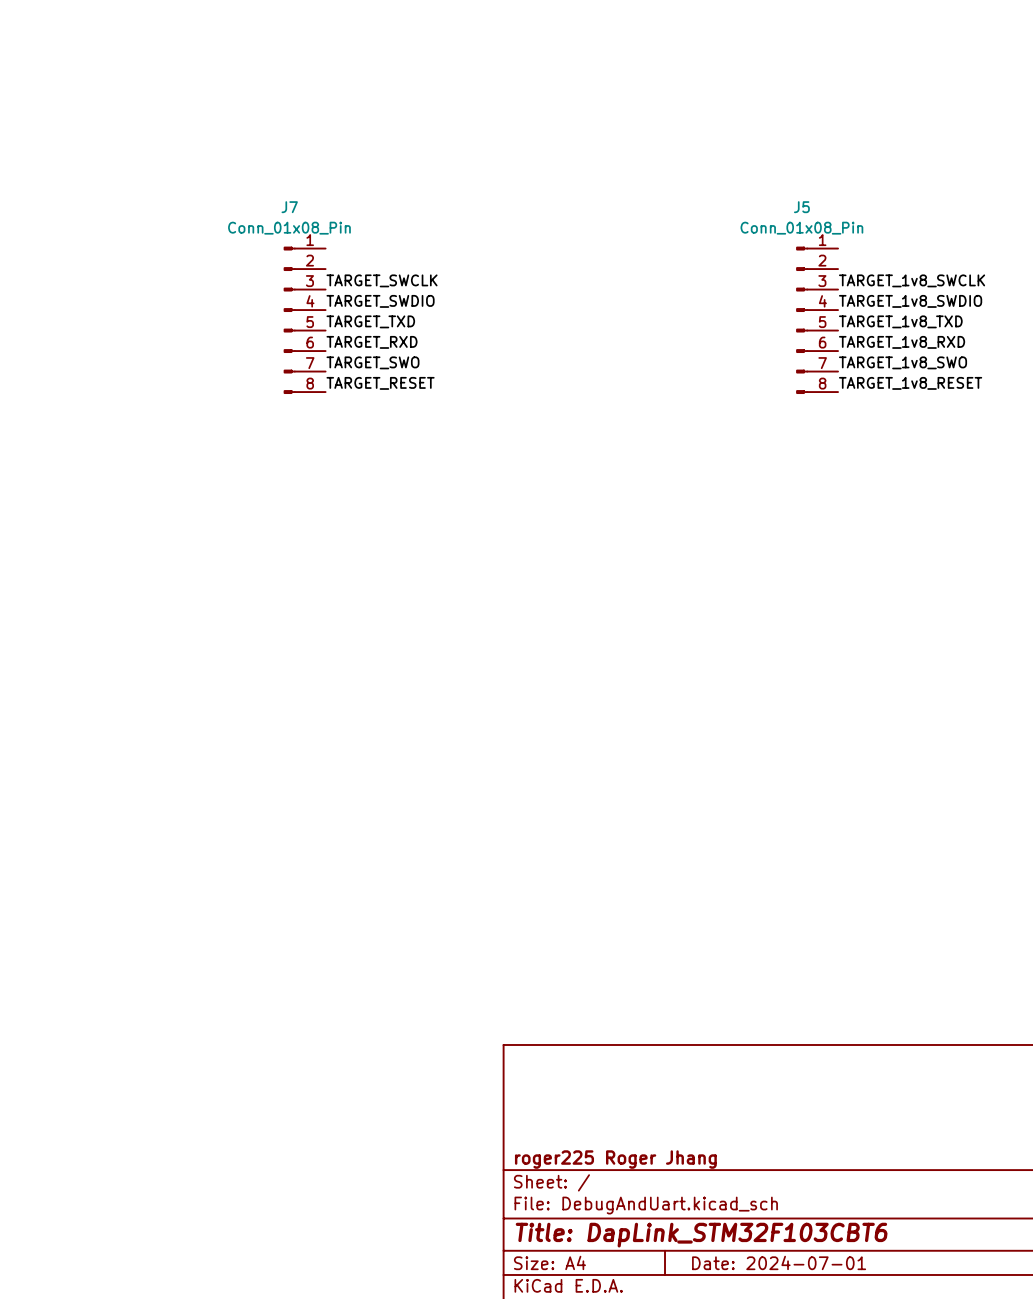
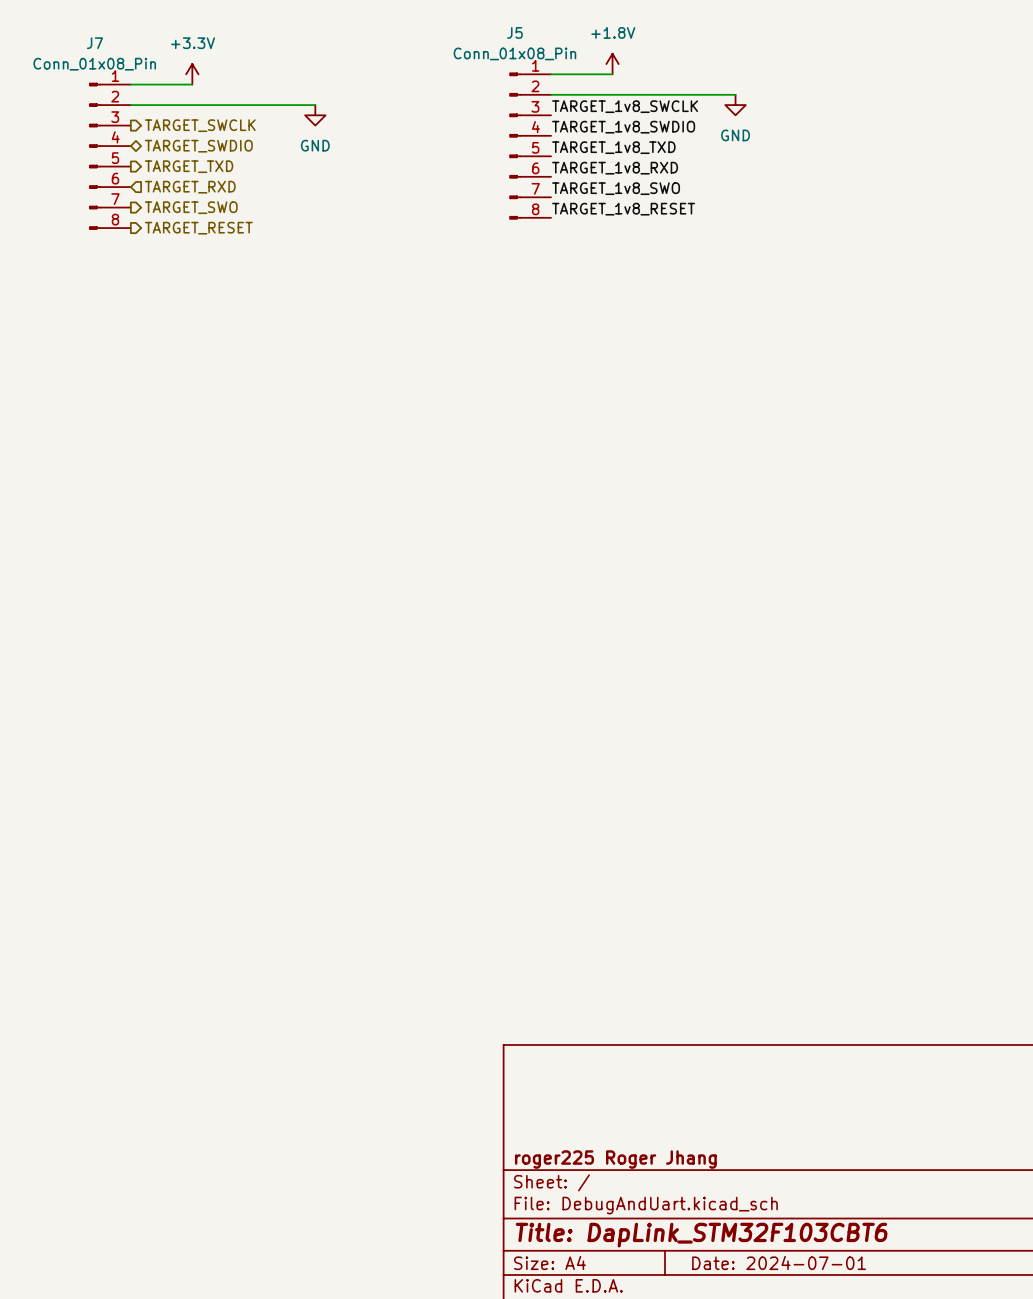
power symbol: none -> +1.8V (612, 64)
power symbol: none -> +3.3V (192, 74)
wire: none -> (551, 74) (612, 74)
wire: none -> (130, 84) (192, 84)
wire: none -> (551, 94) (735, 94)
wire: none -> (130, 105) (315, 105)
power symbol: none -> GND (735, 105)
label: none -> TARGET_1v8_SWCLK (625, 106)
power symbol: none -> GND (315, 115)
hierarchical label: none -> TARGET_SWCLK (200, 125)
label: none -> TARGET_1v8_SWDIO (623, 127)
hierarchical label: none -> TARGET_SWDIO (198, 146)
label: none -> TARGET_1v8_TXD (613, 147)
hierarchical label: none -> TARGET_TXD (189, 166)
label: none -> TARGET_1v8_RXD (615, 168)
hierarchical label: none -> TARGET_RXD (190, 187)
label: none -> TARGET_1v8_SWO (616, 188)
hierarchical label: none -> TARGET_SWO (191, 207)
label: none -> TARGET_1v8_RESET (623, 209)
hierarchical label: none -> TARGET_RESET (198, 228)
label: TARGET_SWCLK (382, 280) -> none
label: TARGET_1v8_SWCLK (912, 280) -> none
label: TARGET_SWDIO (380, 301) -> none
label: TARGET_1v8_SWDIO (910, 301) -> none
J7 position: (304, 320) -> (110, 156)
J5 position: (817, 320) -> (530, 146)
label: TARGET_TXD (370, 321) -> none
label: TARGET_1v8_TXD (900, 321) -> none
label: TARGET_RXD (372, 342) -> none
label: TARGET_1v8_RXD (902, 342) -> none
label: TARGET_SWO (372, 362) -> none
label: TARGET_1v8_SWO (903, 362) -> none
label: TARGET_RESET (380, 383) -> none
label: TARGET_1v8_RESET (910, 383) -> none

